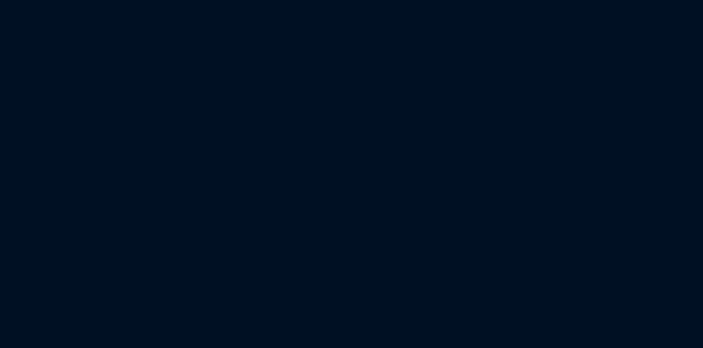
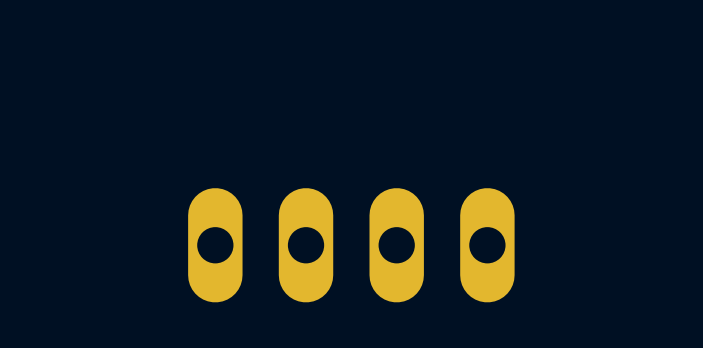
part: none -> (351, 245)

